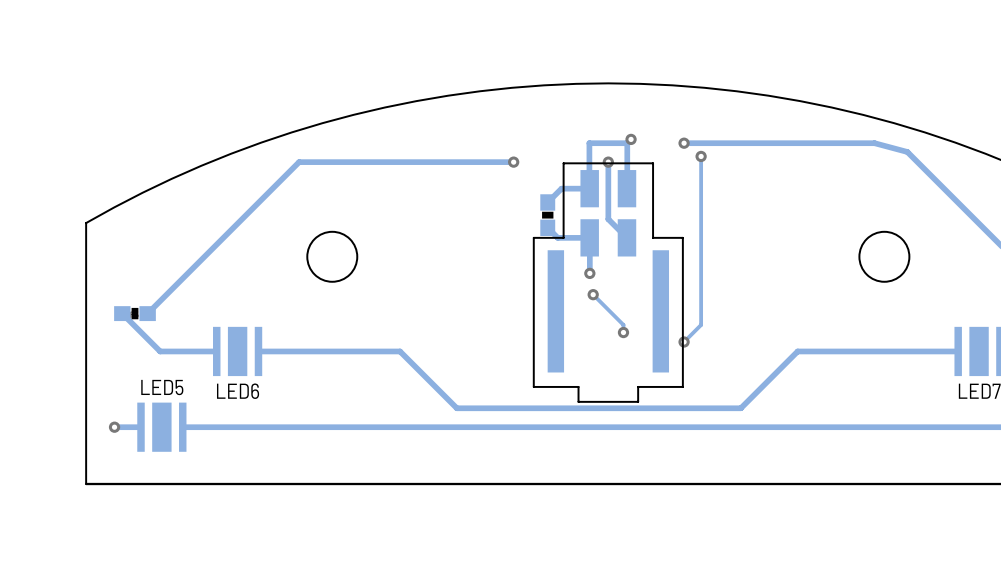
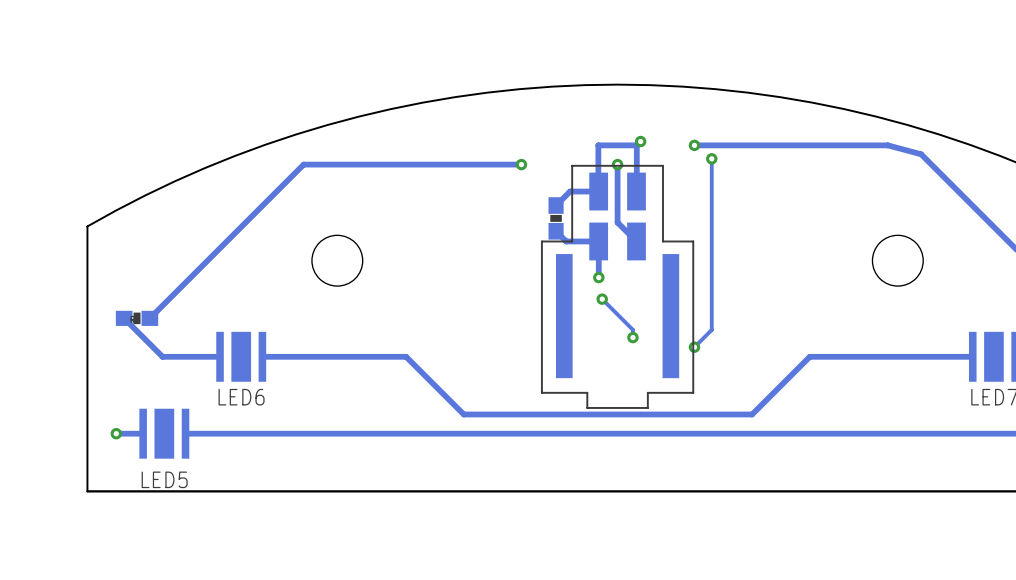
LED5 name position: LED5 (162, 387) -> LED5 (164, 479)

